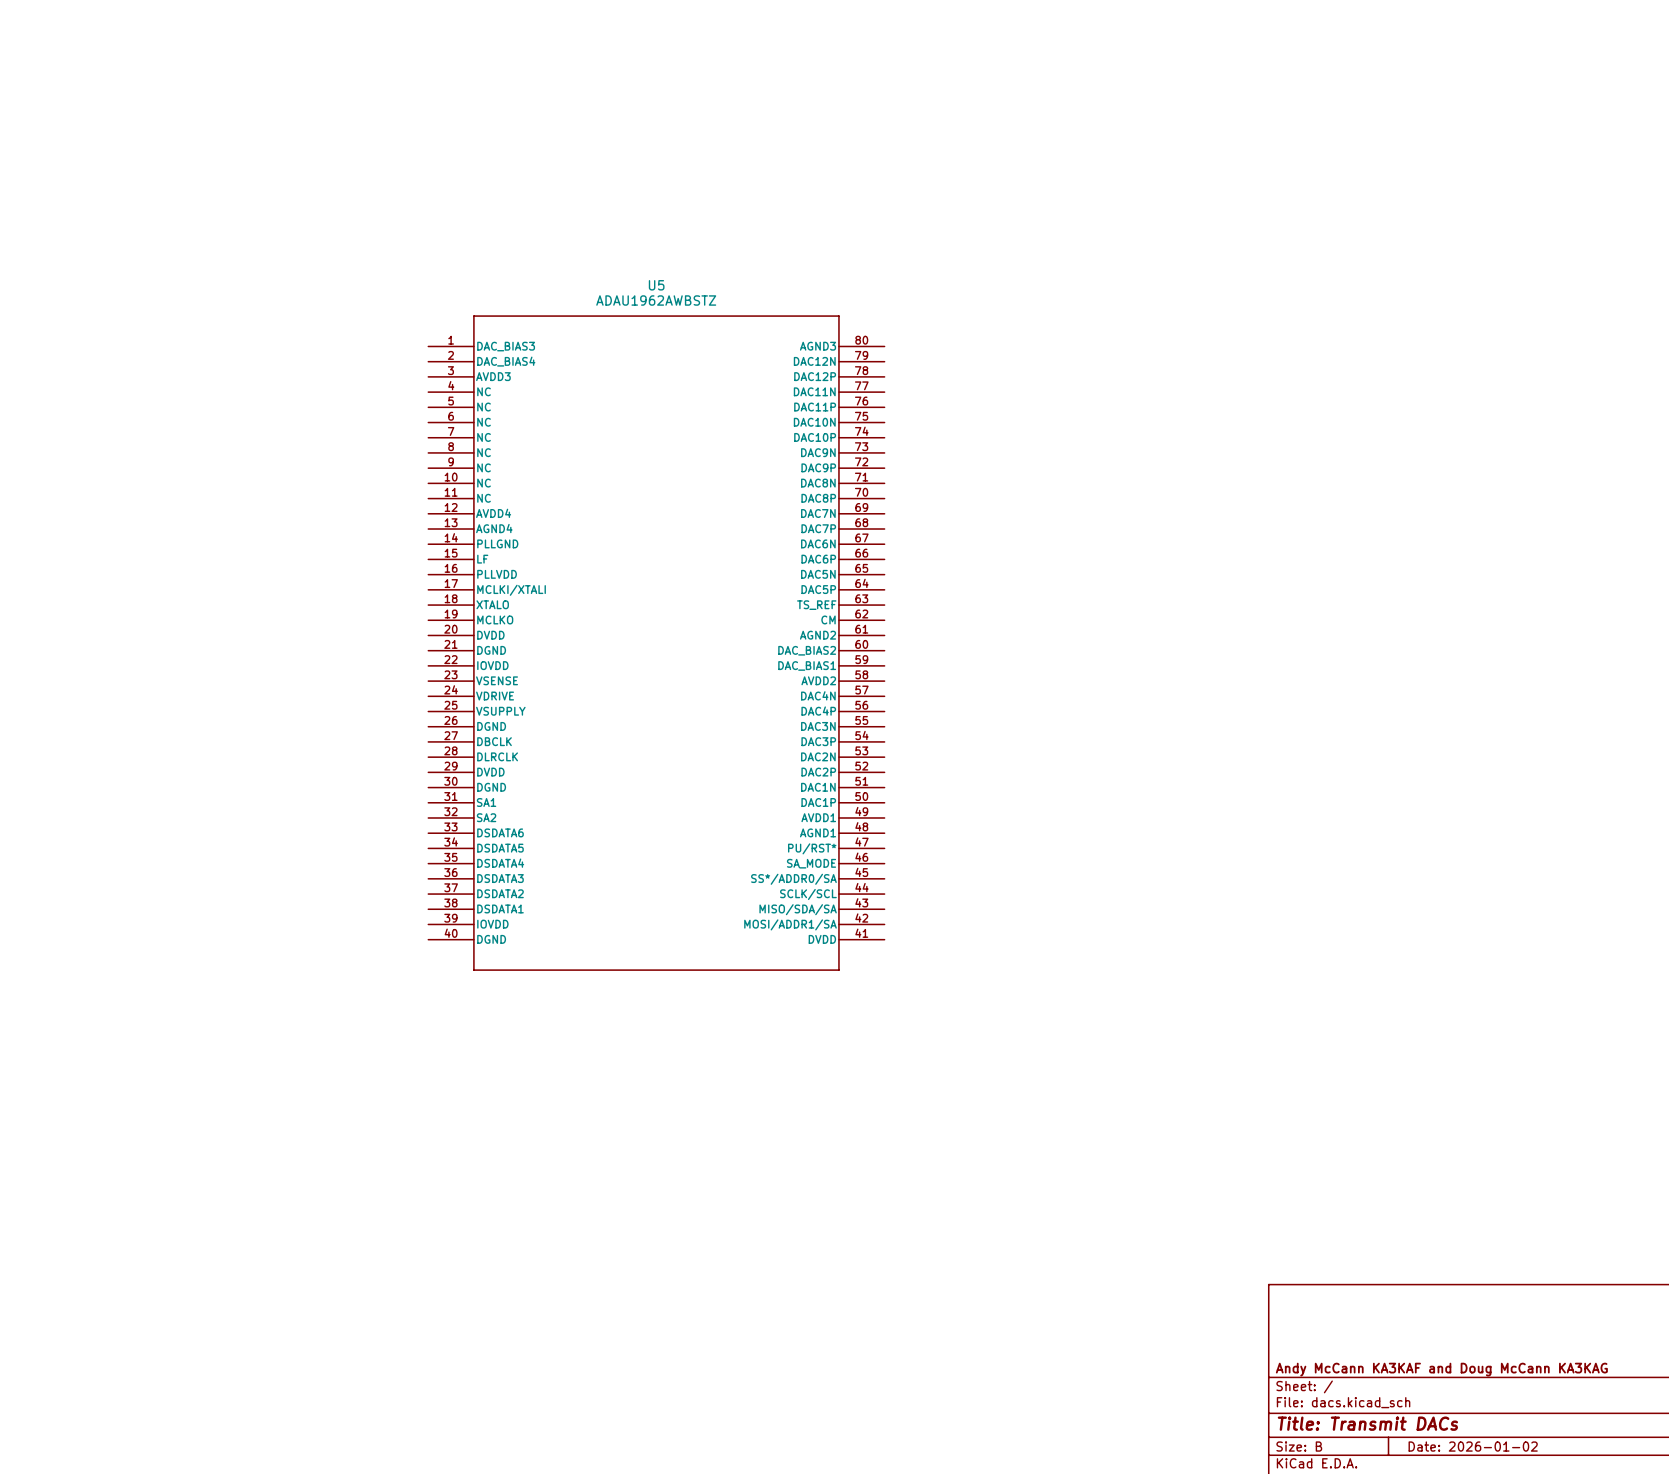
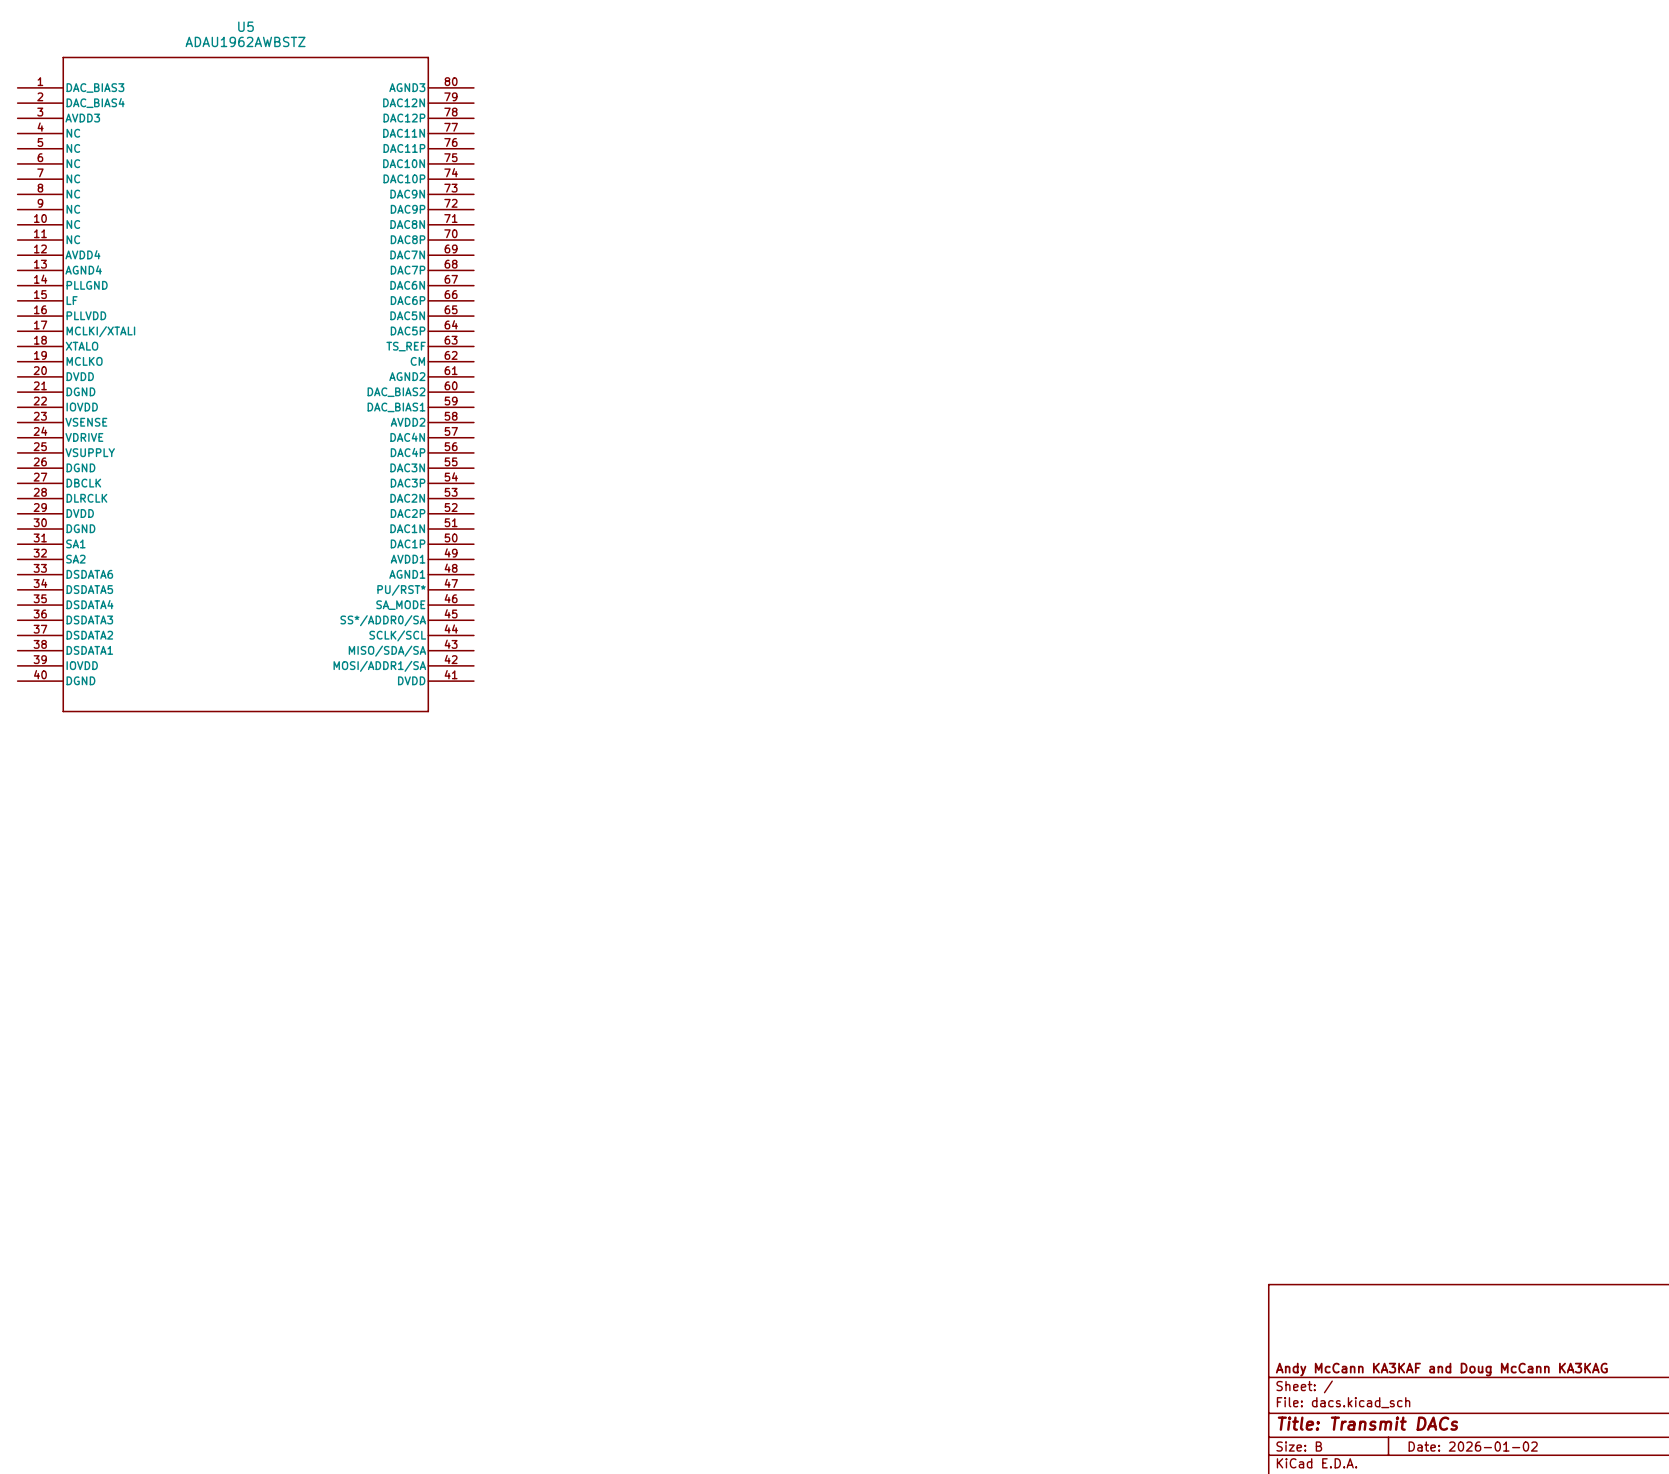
U5 position: (656, 643) -> (245, 384)

